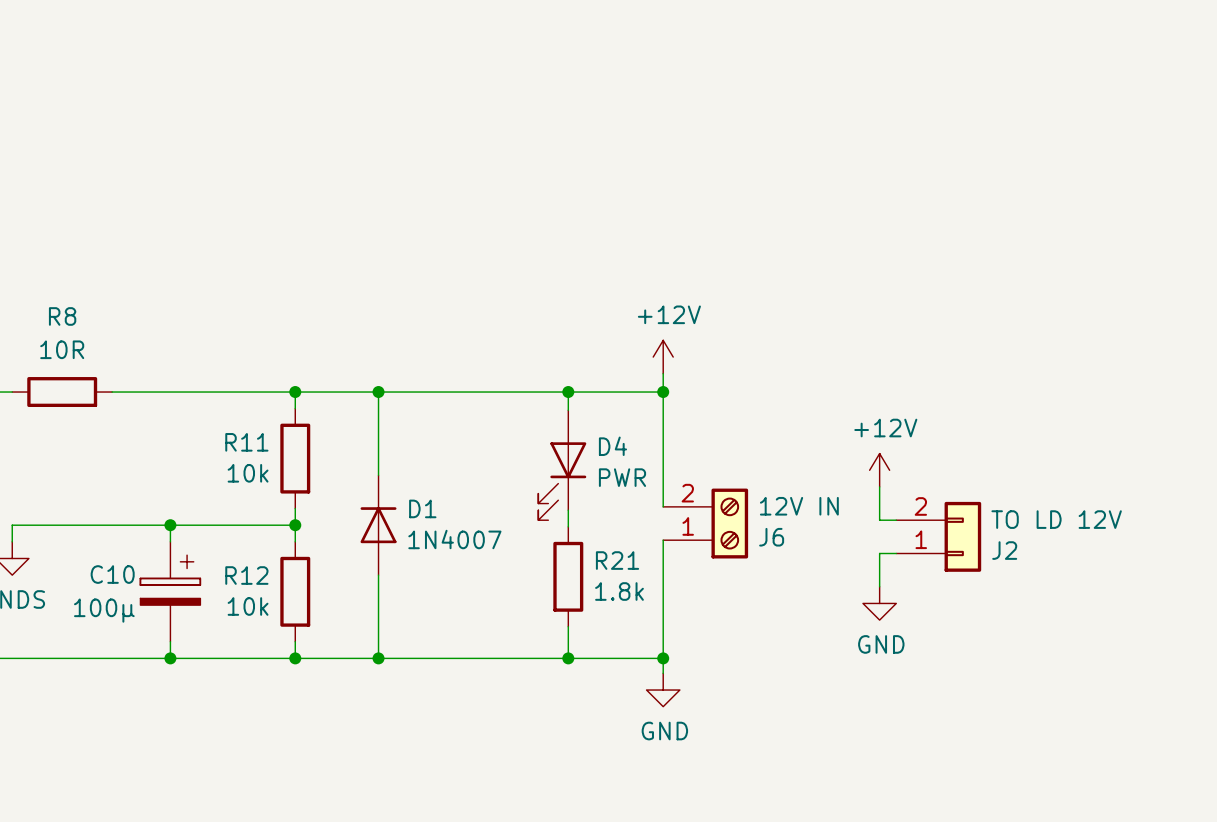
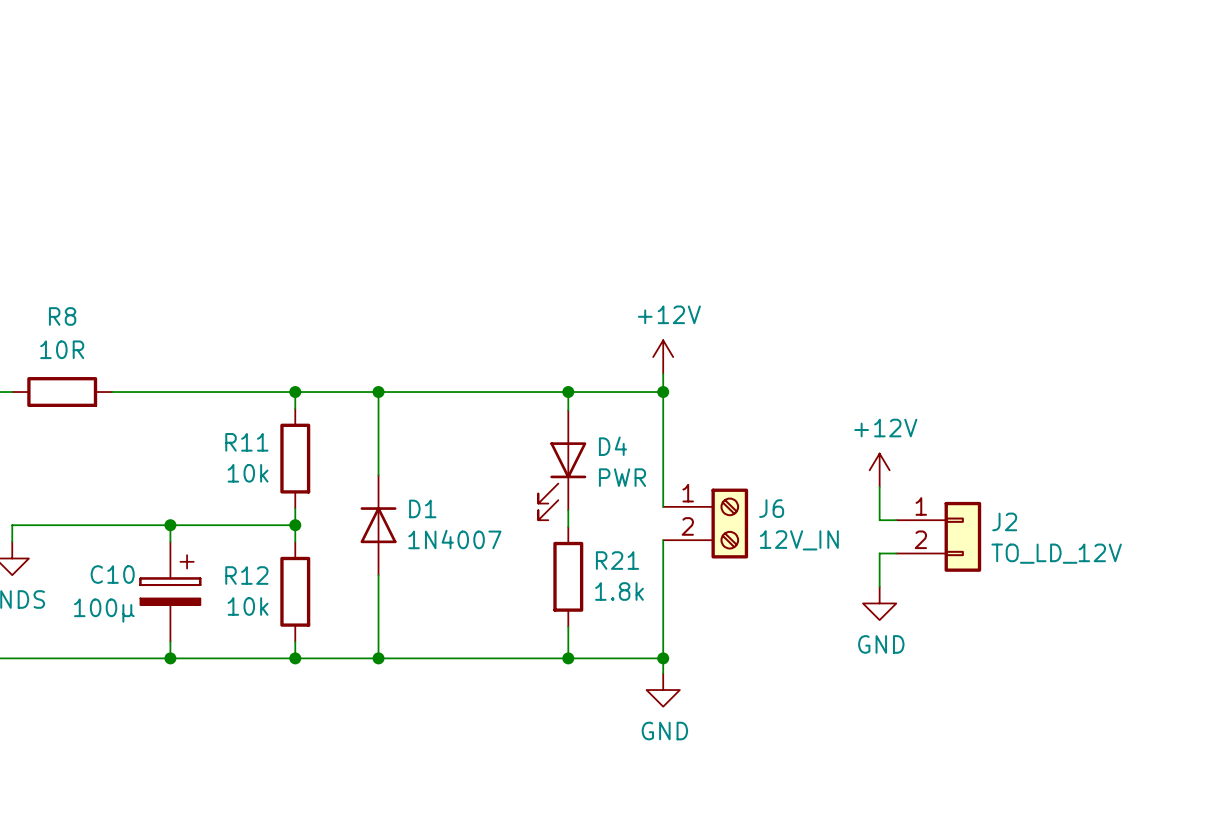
J6 value: 12V IN (799, 506) -> 12V_IN (799, 540)
J2 value: TO LD 12V (1056, 519) -> TO_LD_12V (1056, 553)
J6 flip: as is (729, 523) -> up-down (729, 523)
J2 flip: as is (962, 536) -> up-down (962, 536)

